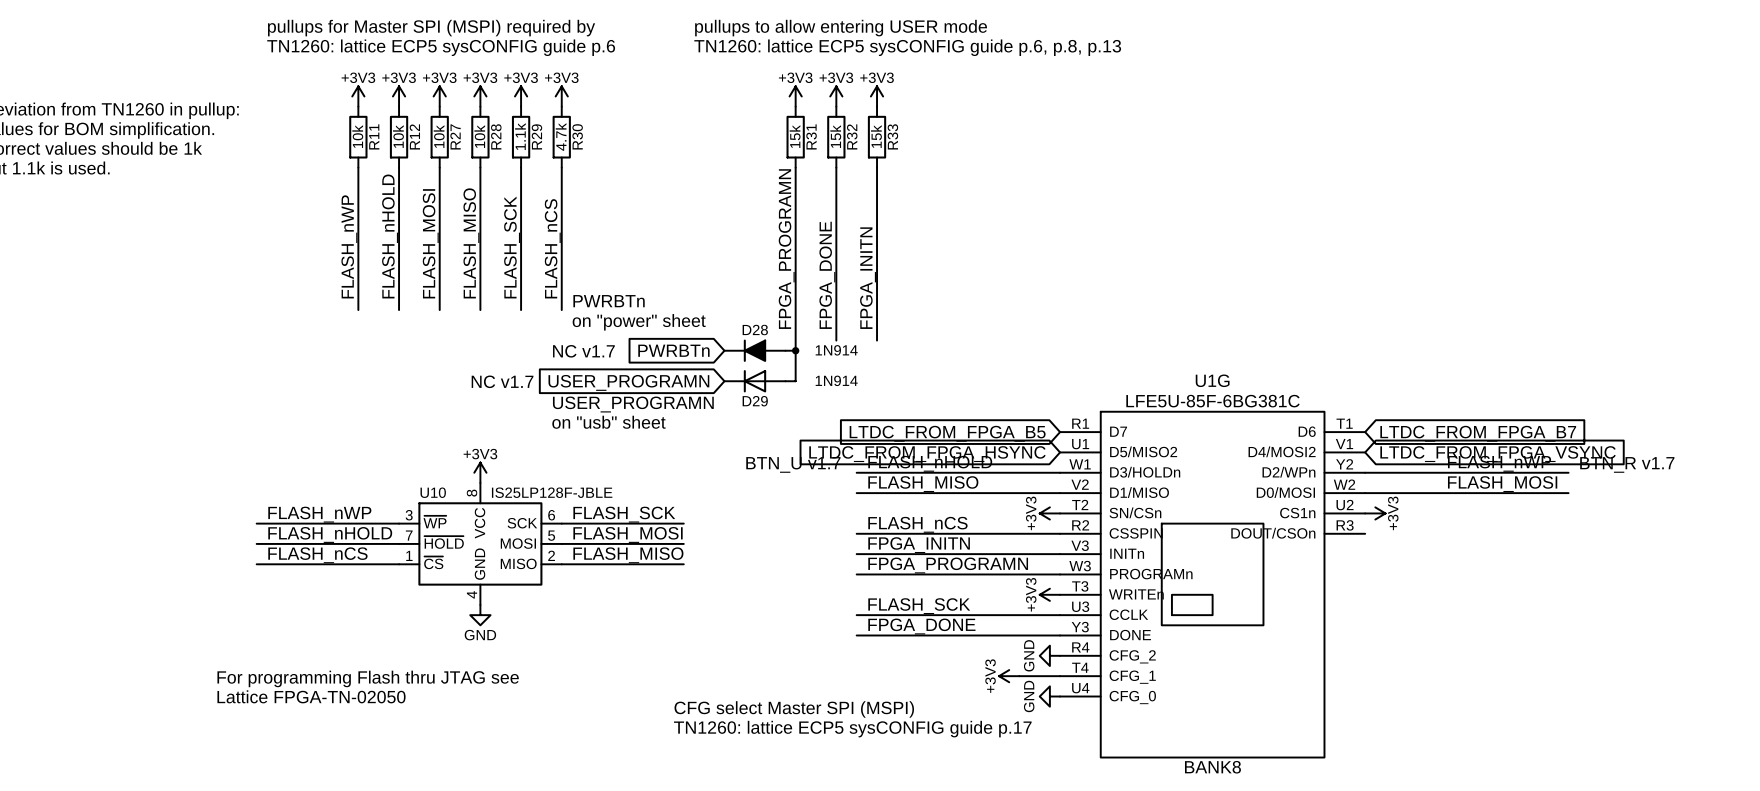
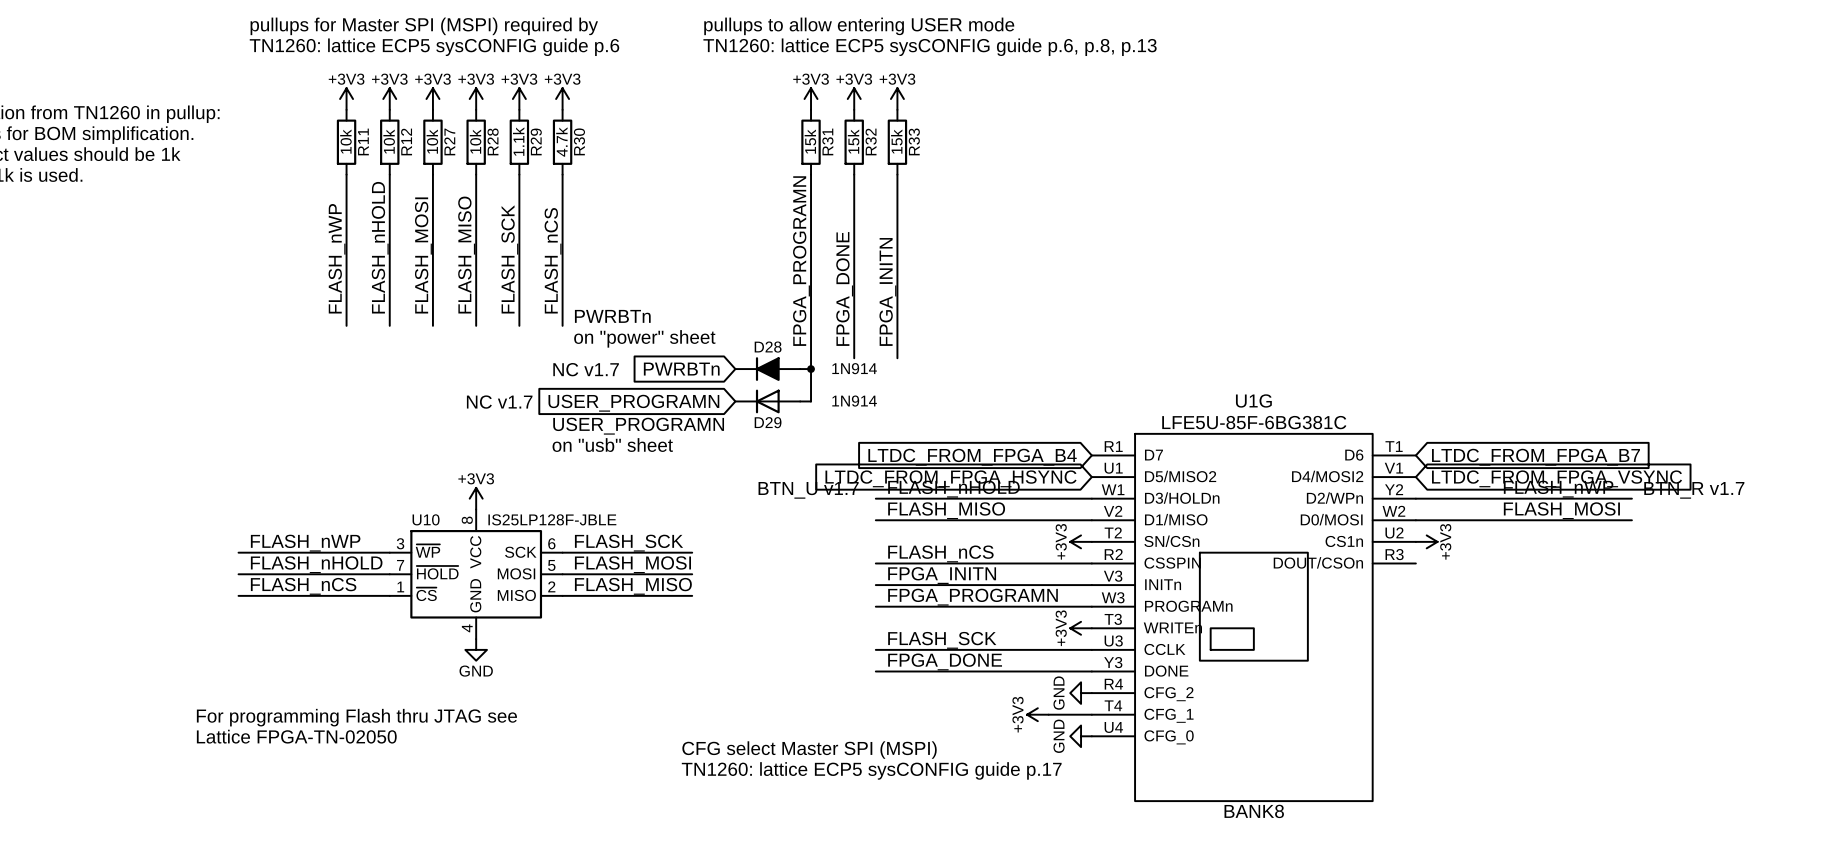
global label: LTDC_FROM_FPGA_B5 (947, 433) -> LTDC_FROM_FPGA_B4 (972, 457)

